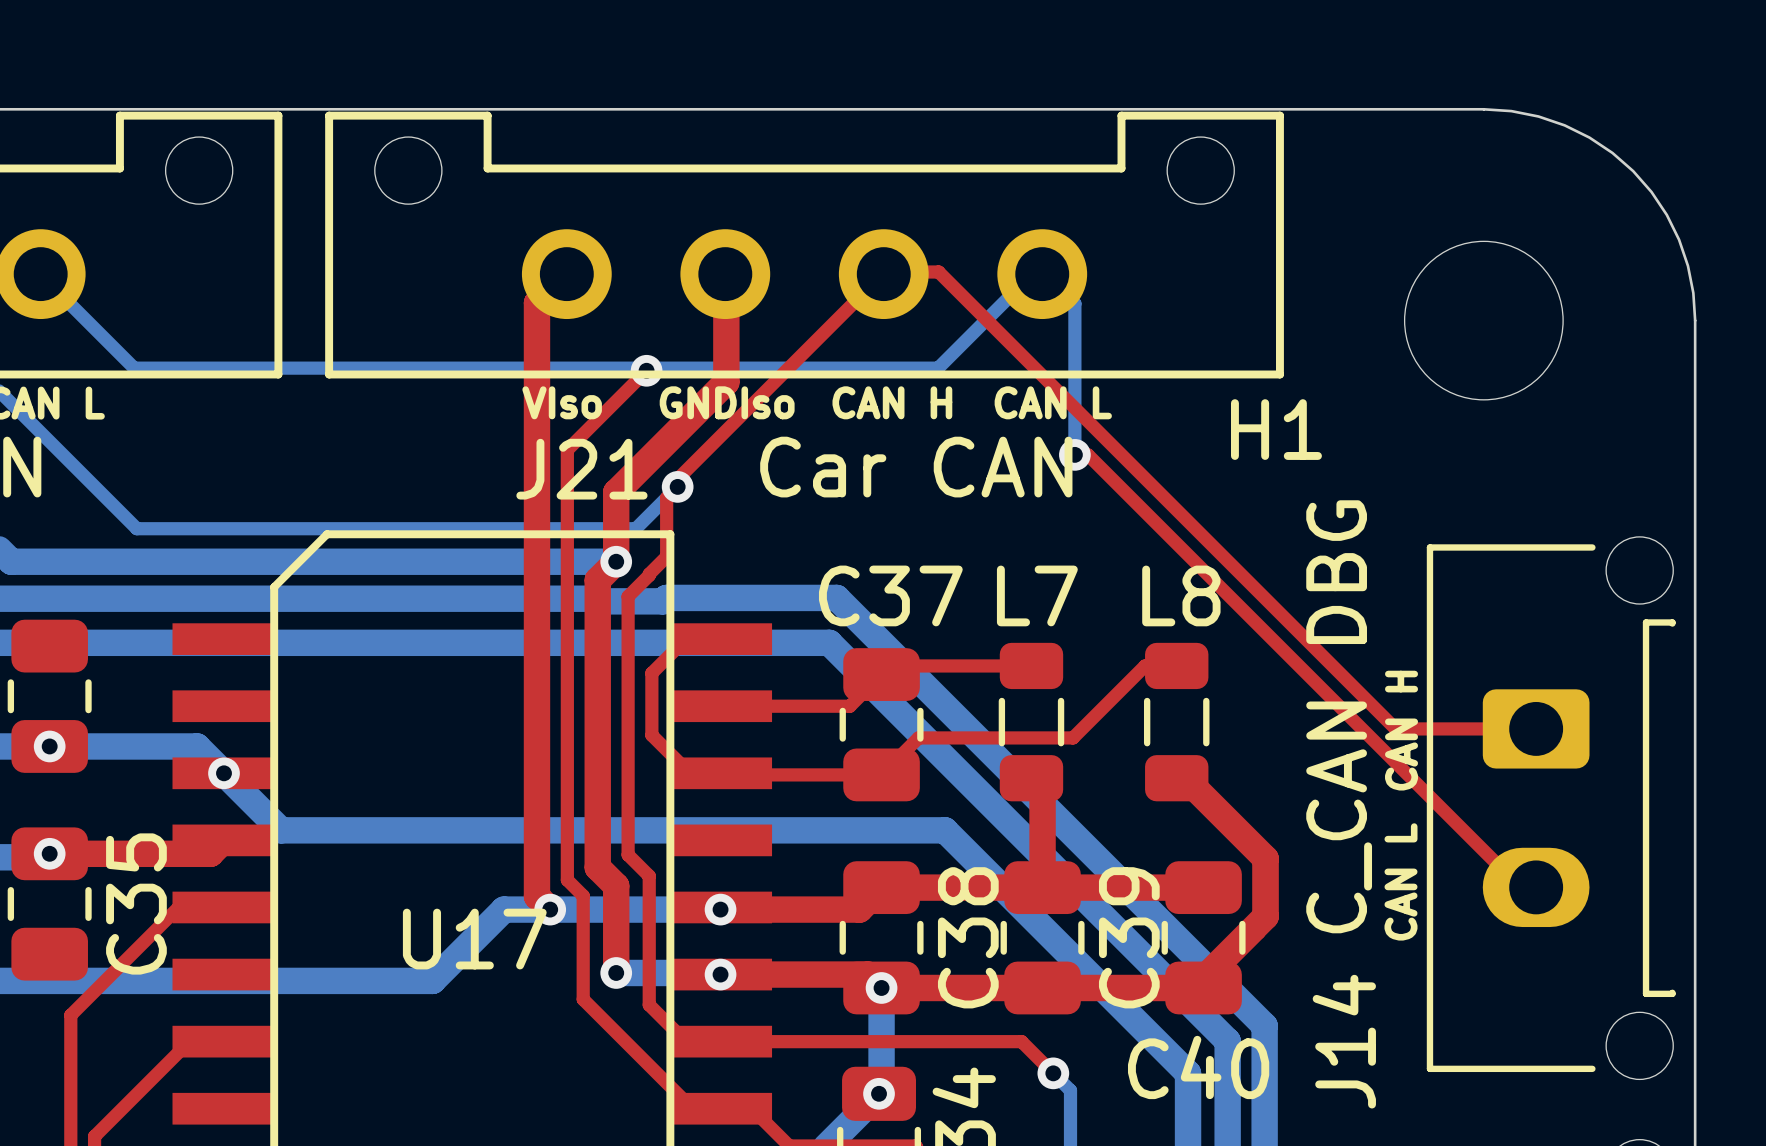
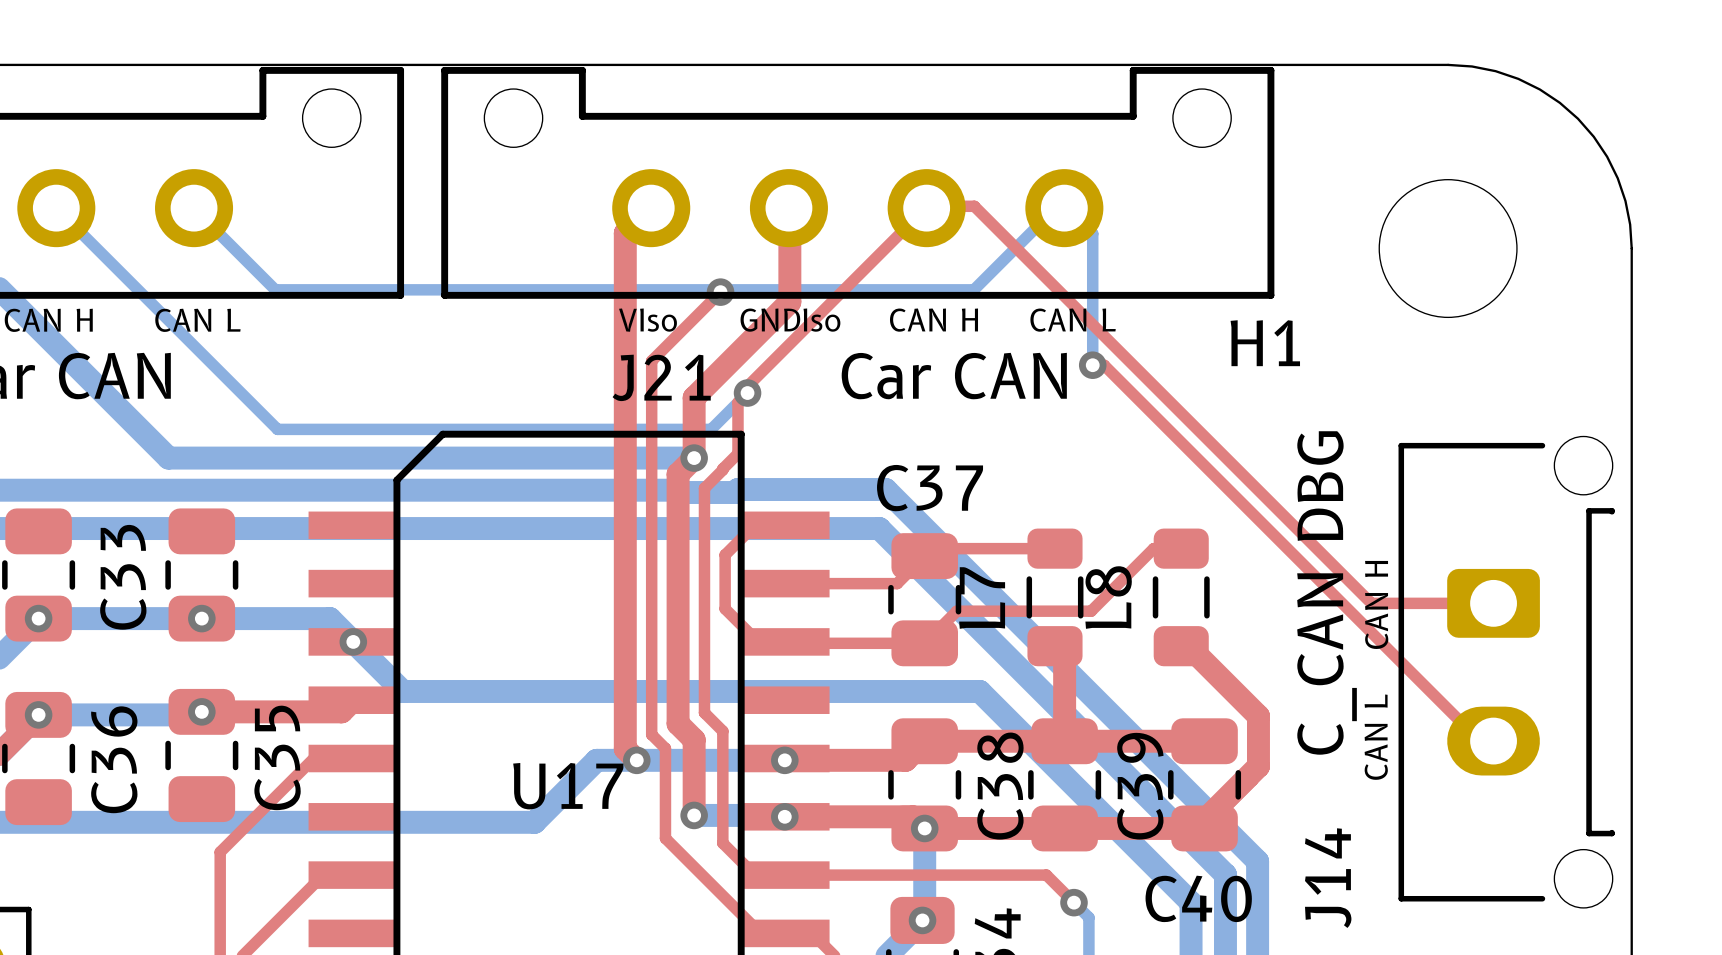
L7 name rotation: 0° (1037, 595) -> 90° counterclockwise (982, 598)
L7 name position: L7 (1037, 595) -> L7 (982, 598)
L8 name rotation: 0° (1181, 595) -> 90° counterclockwise (1108, 597)
L8 name position: L8 (1181, 595) -> L8 (1108, 597)

